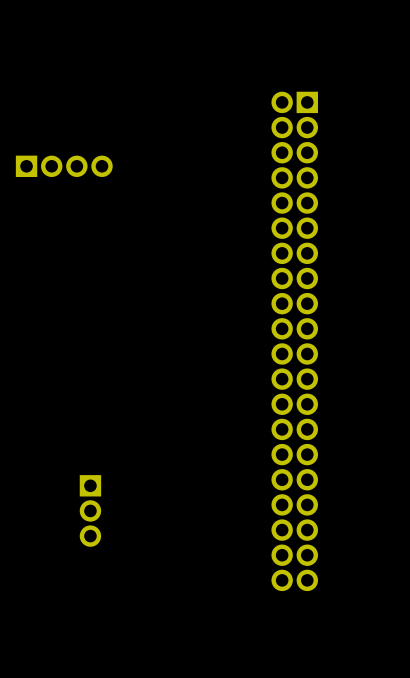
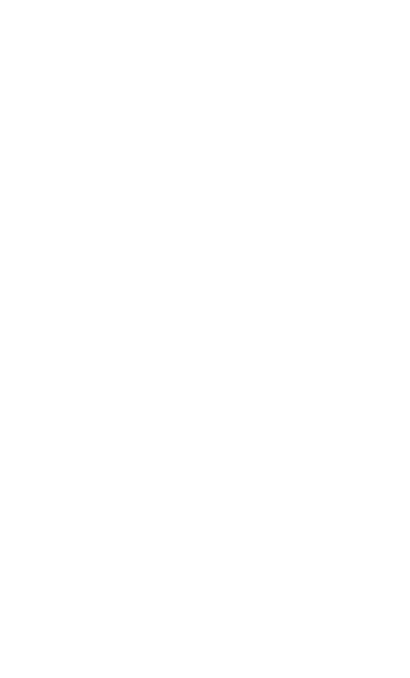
part: (64, 166) -> none
part: (294, 341) -> none
part: (90, 510) -> none

